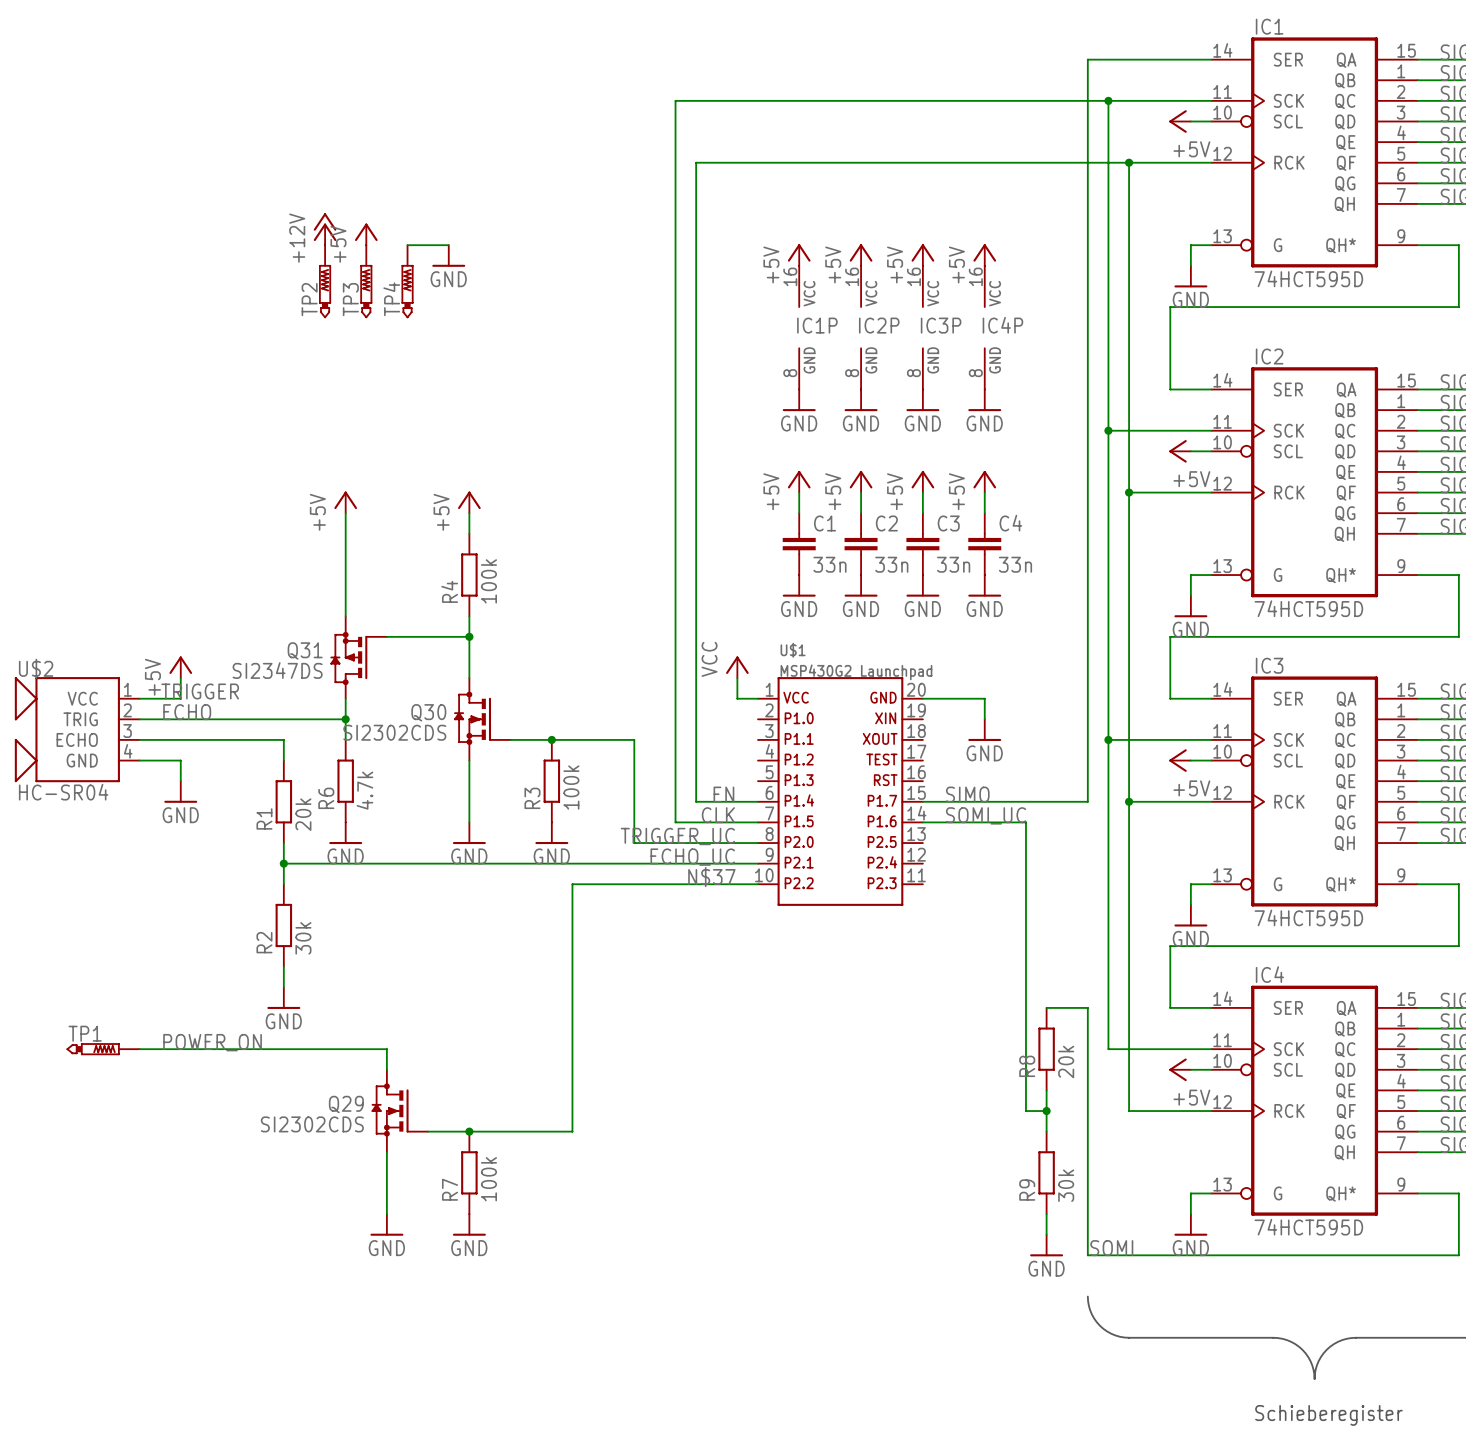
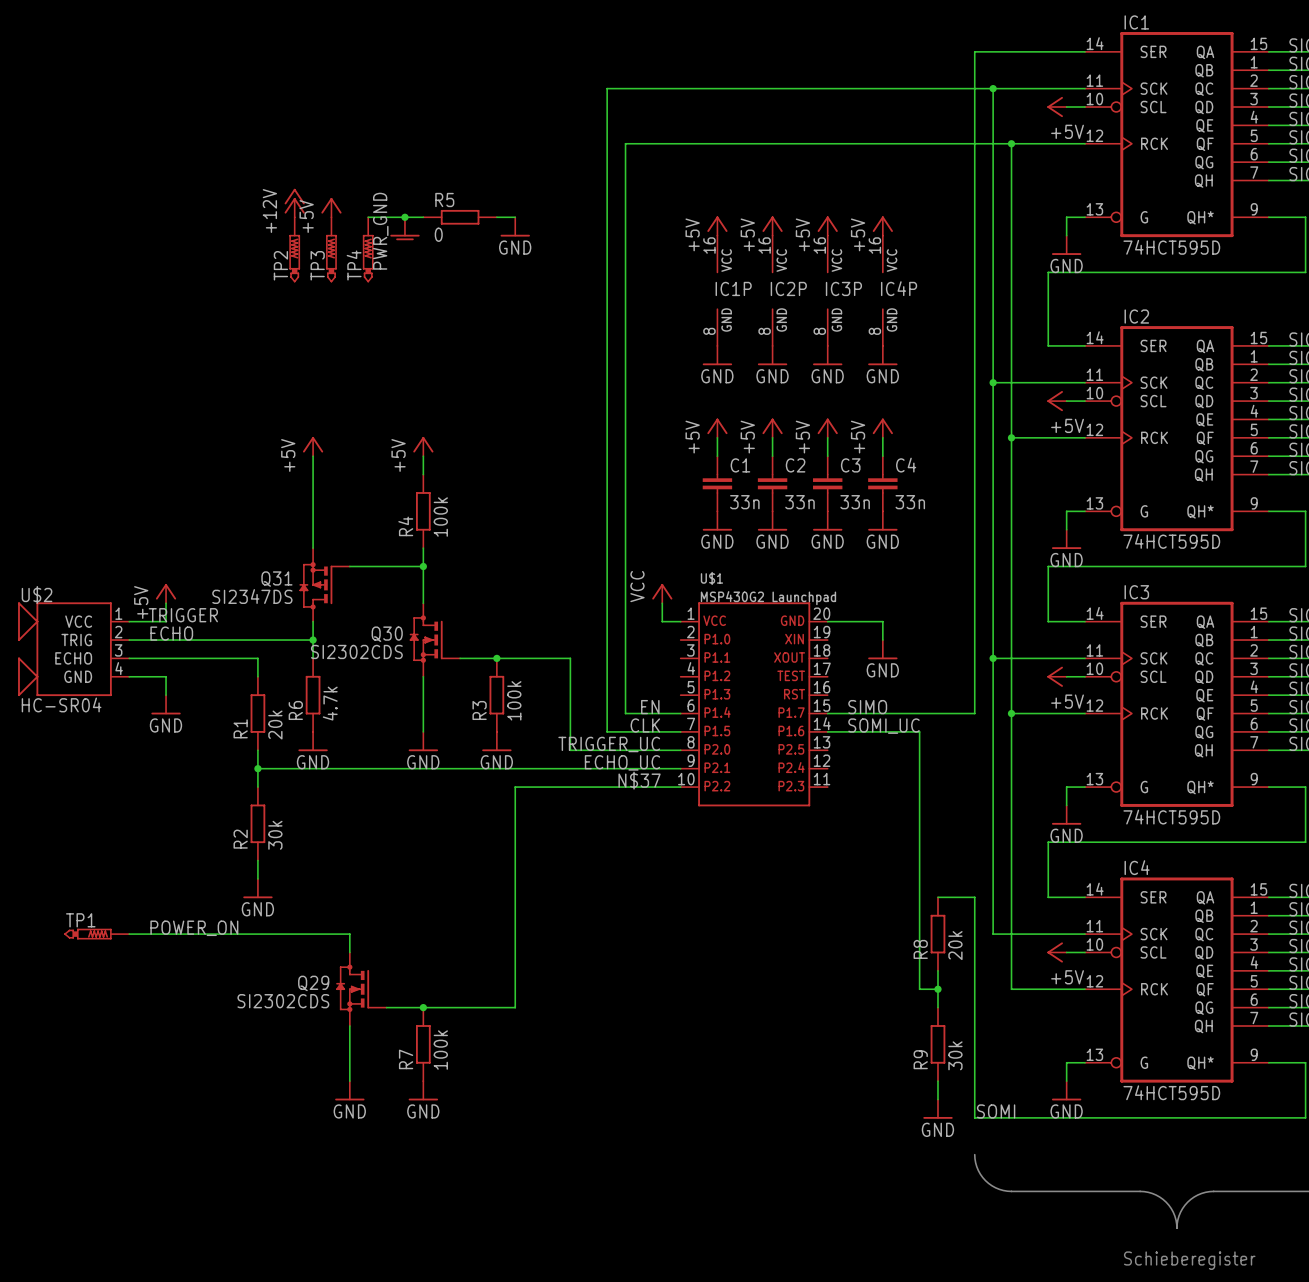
wire: none -> (404, 217) (423, 217)
junction: none -> (404, 217)
R5: none -> 0 (460, 217)
wire: none -> (496, 217) (515, 217)
power symbol: GND (448, 256) -> PWR_GND (404, 228)
power symbol: none -> GND (515, 226)

